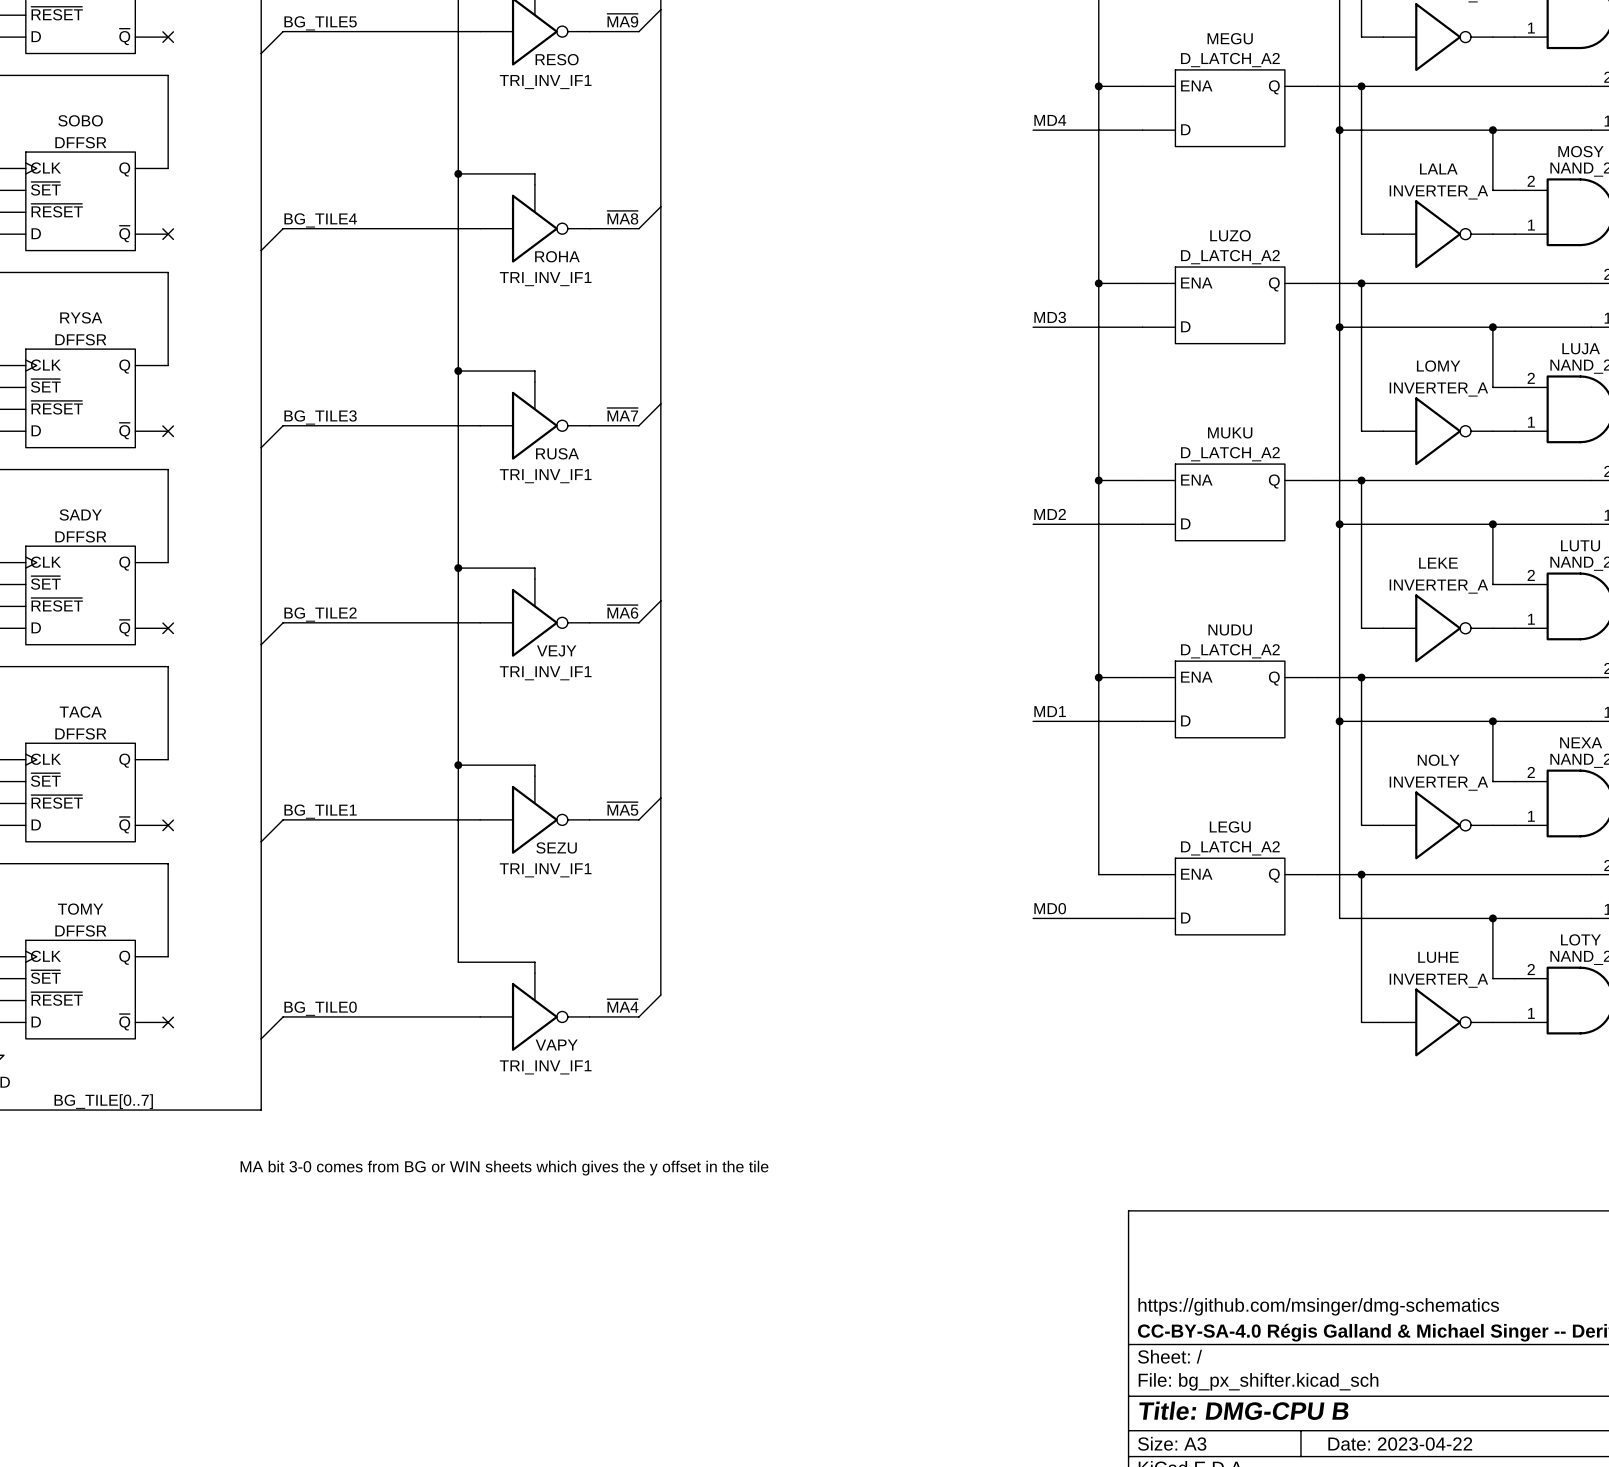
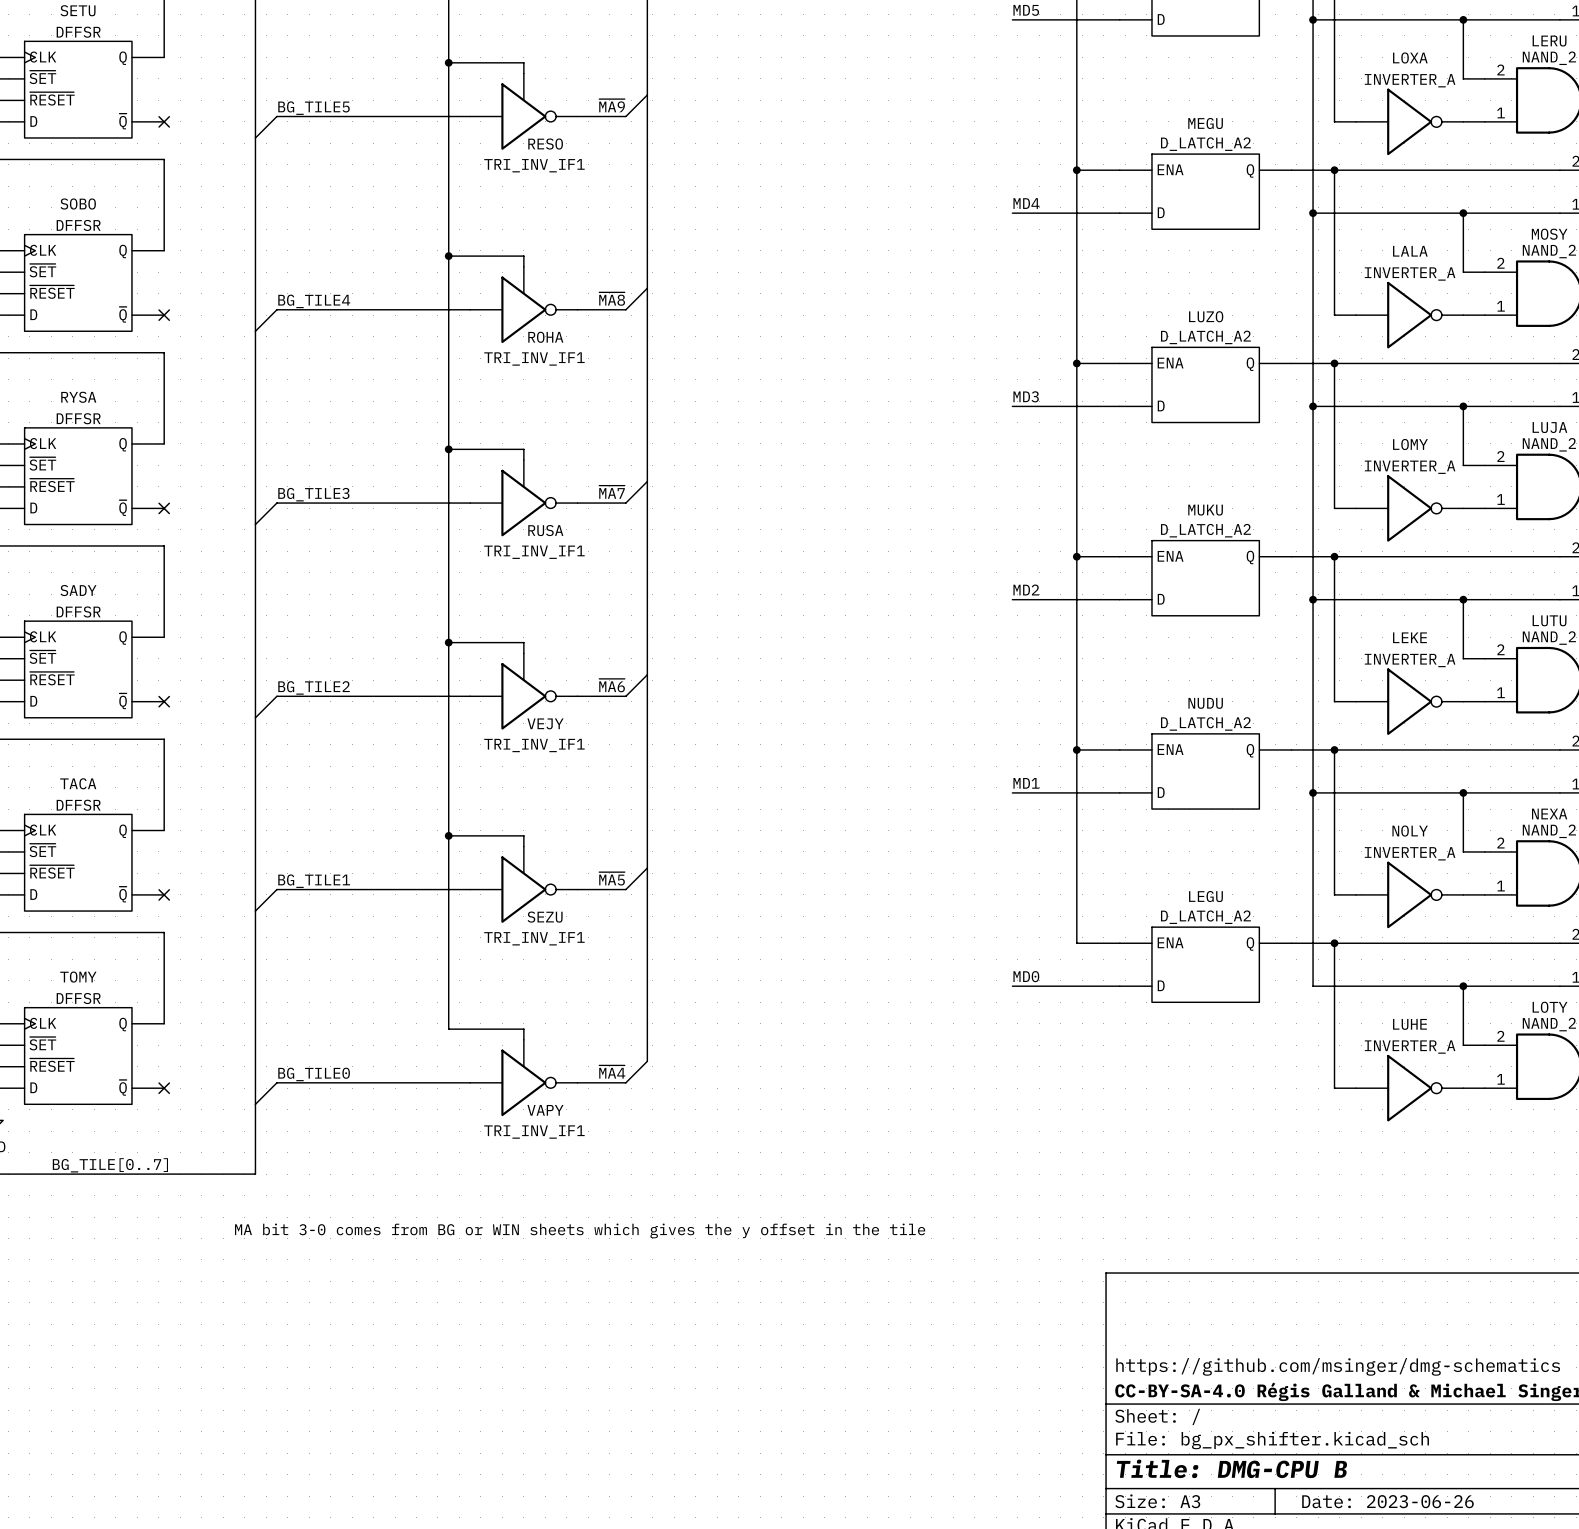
title block: Date: 2023-04-22 (1400, 1444) -> Date: 2023-06-26 (1387, 1501)

